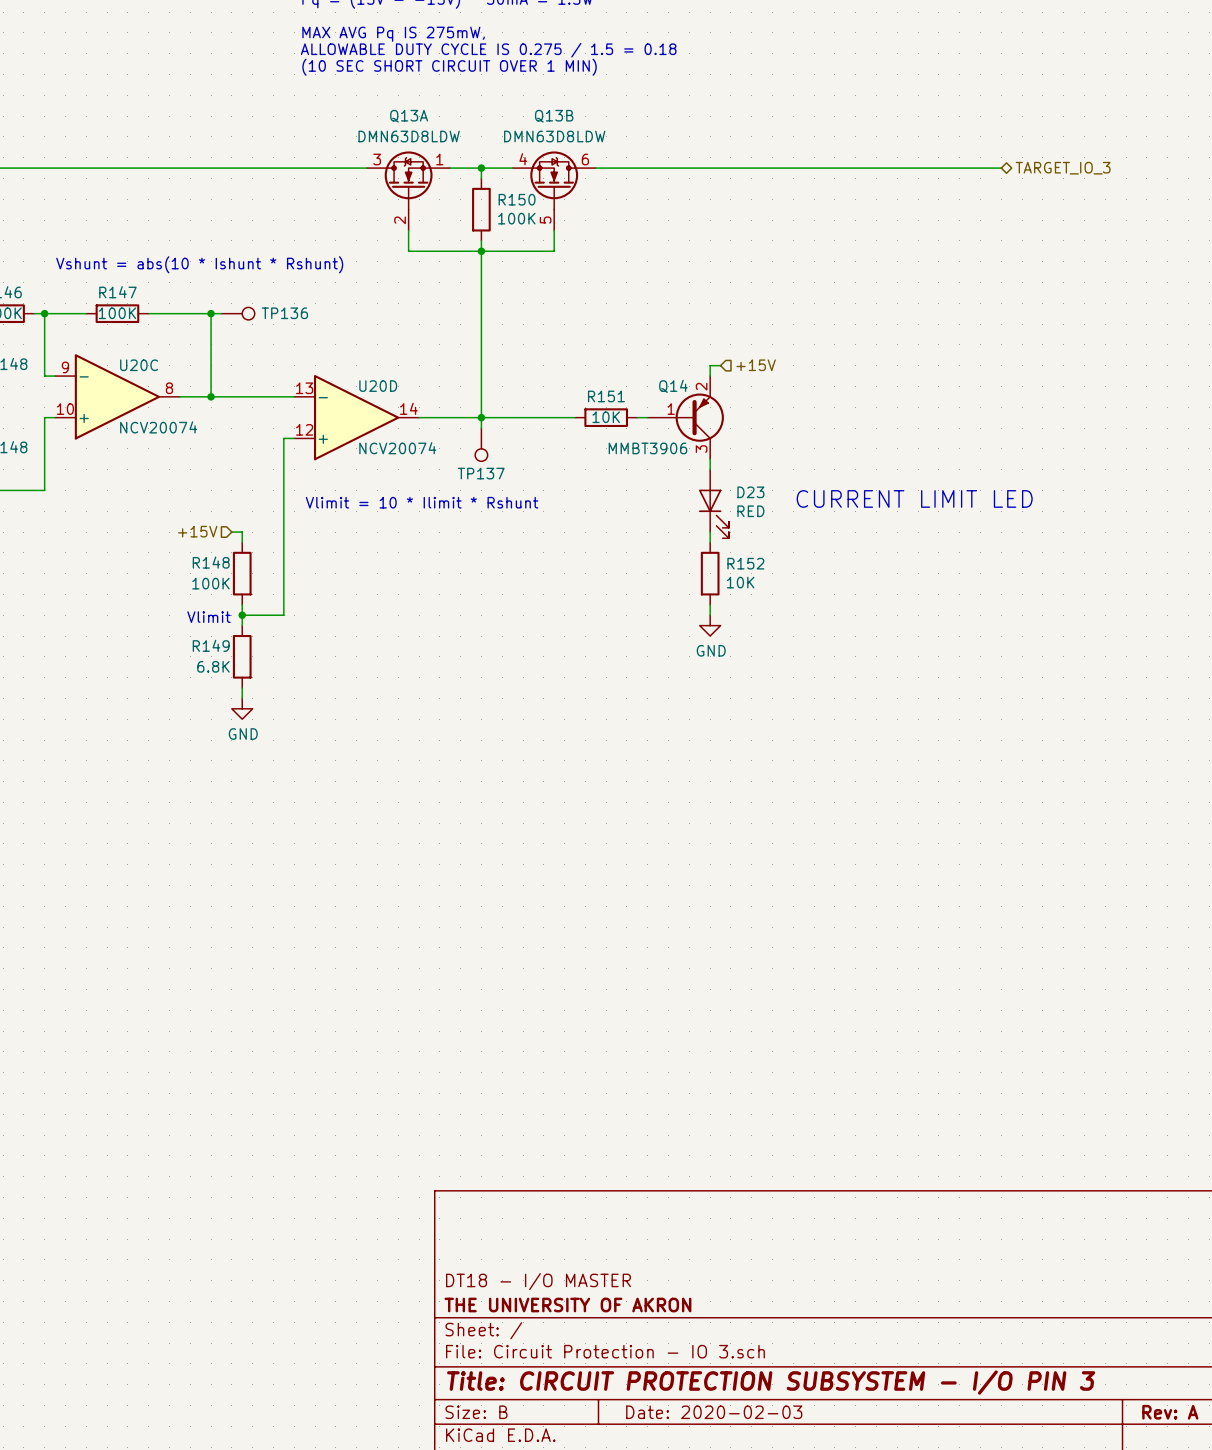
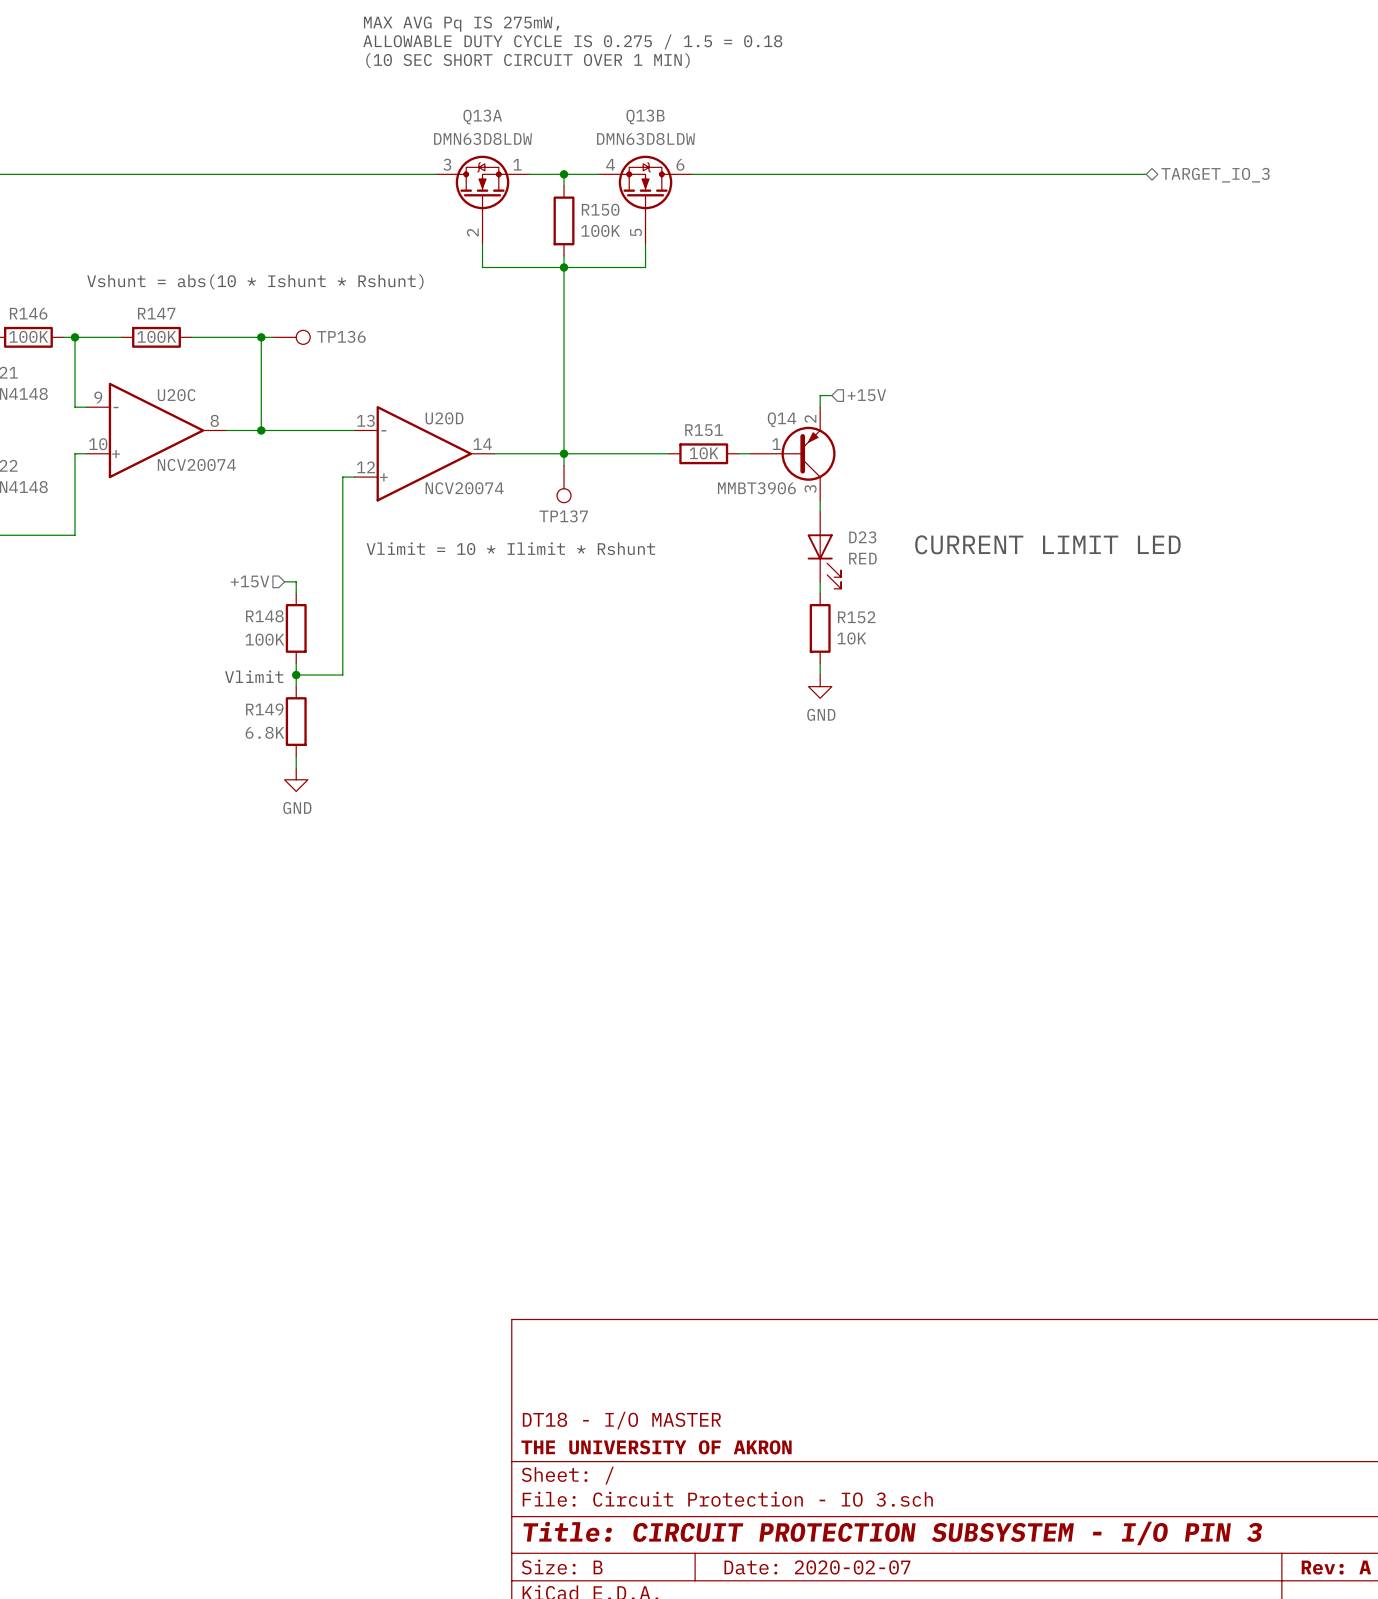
title block: Date: 2020-02-03 (714, 1412) -> Date: 2020-02-07 (817, 1567)

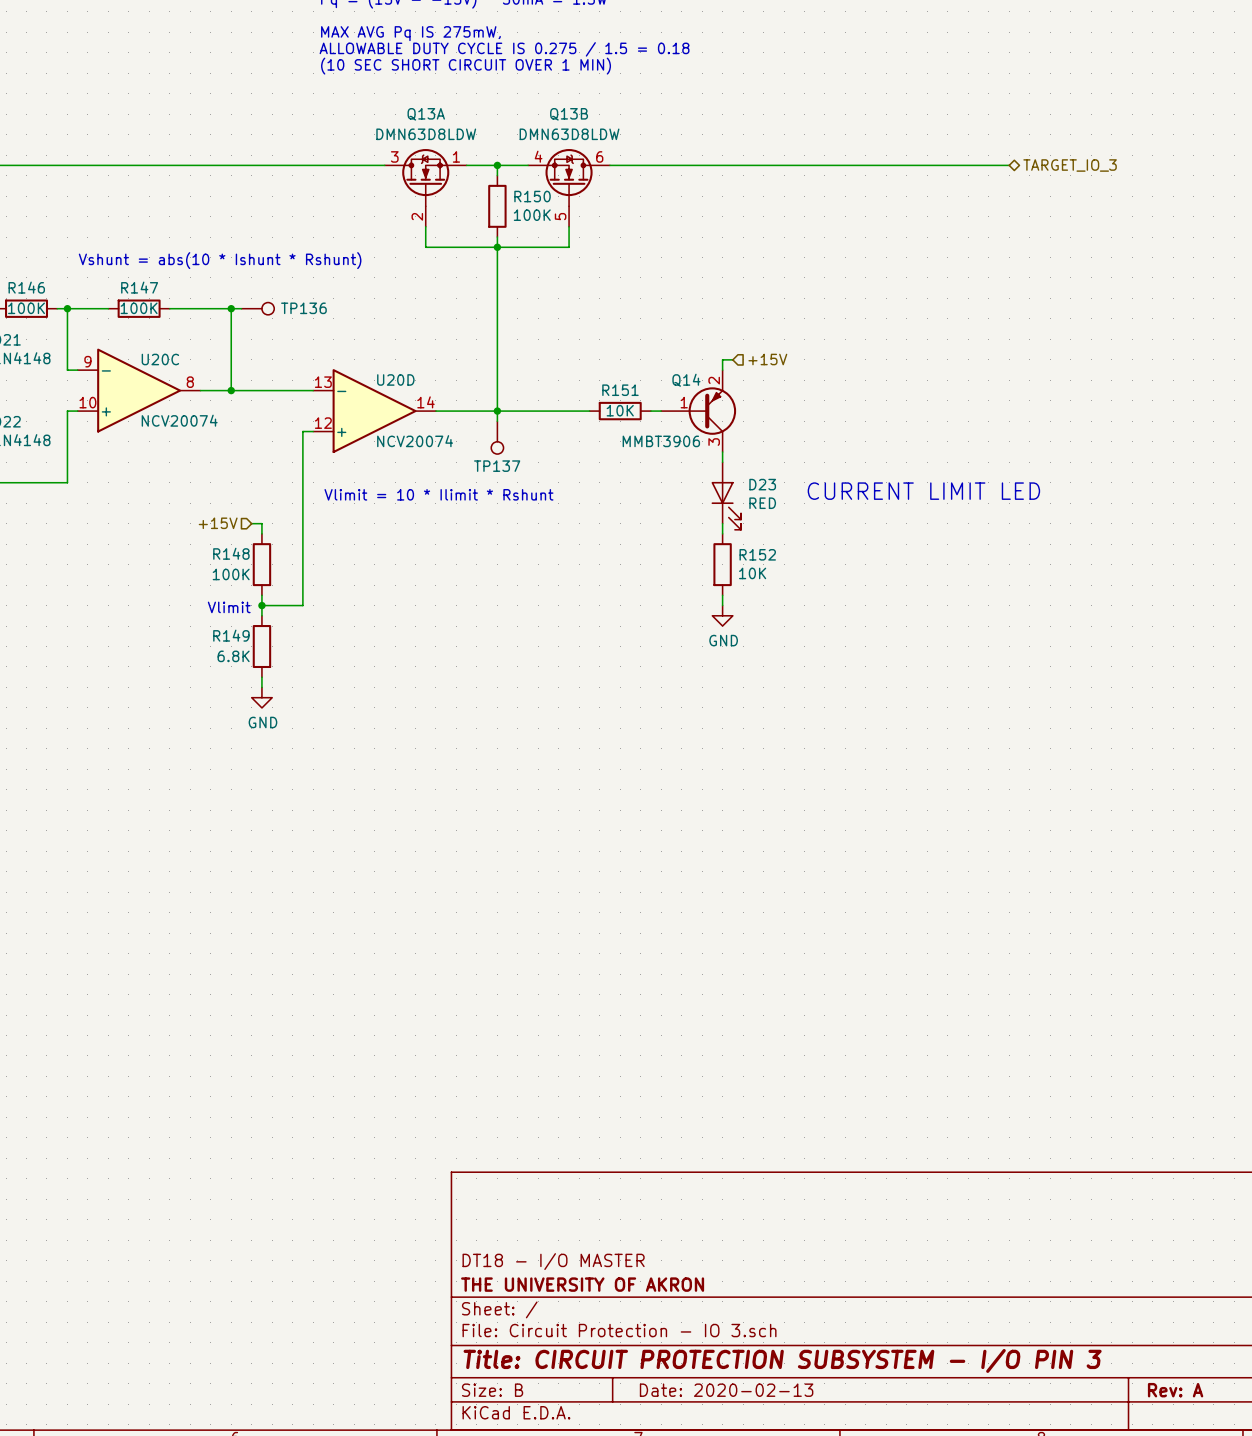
title block: Date: 2020-02-07 (817, 1567) -> Date: 2020-02-13 (726, 1390)

